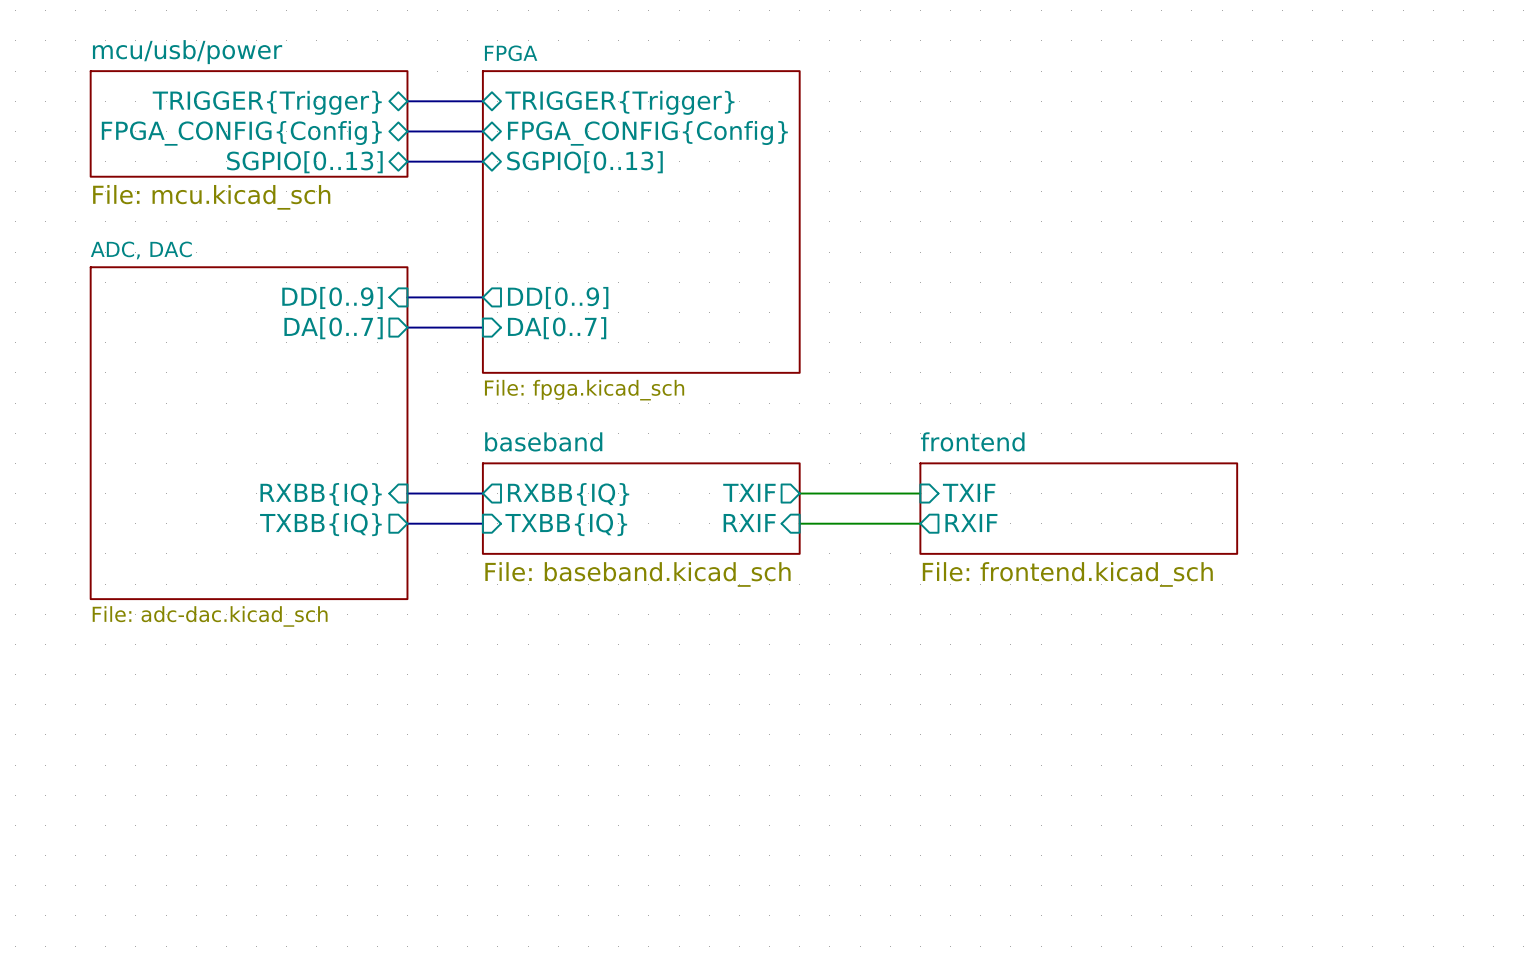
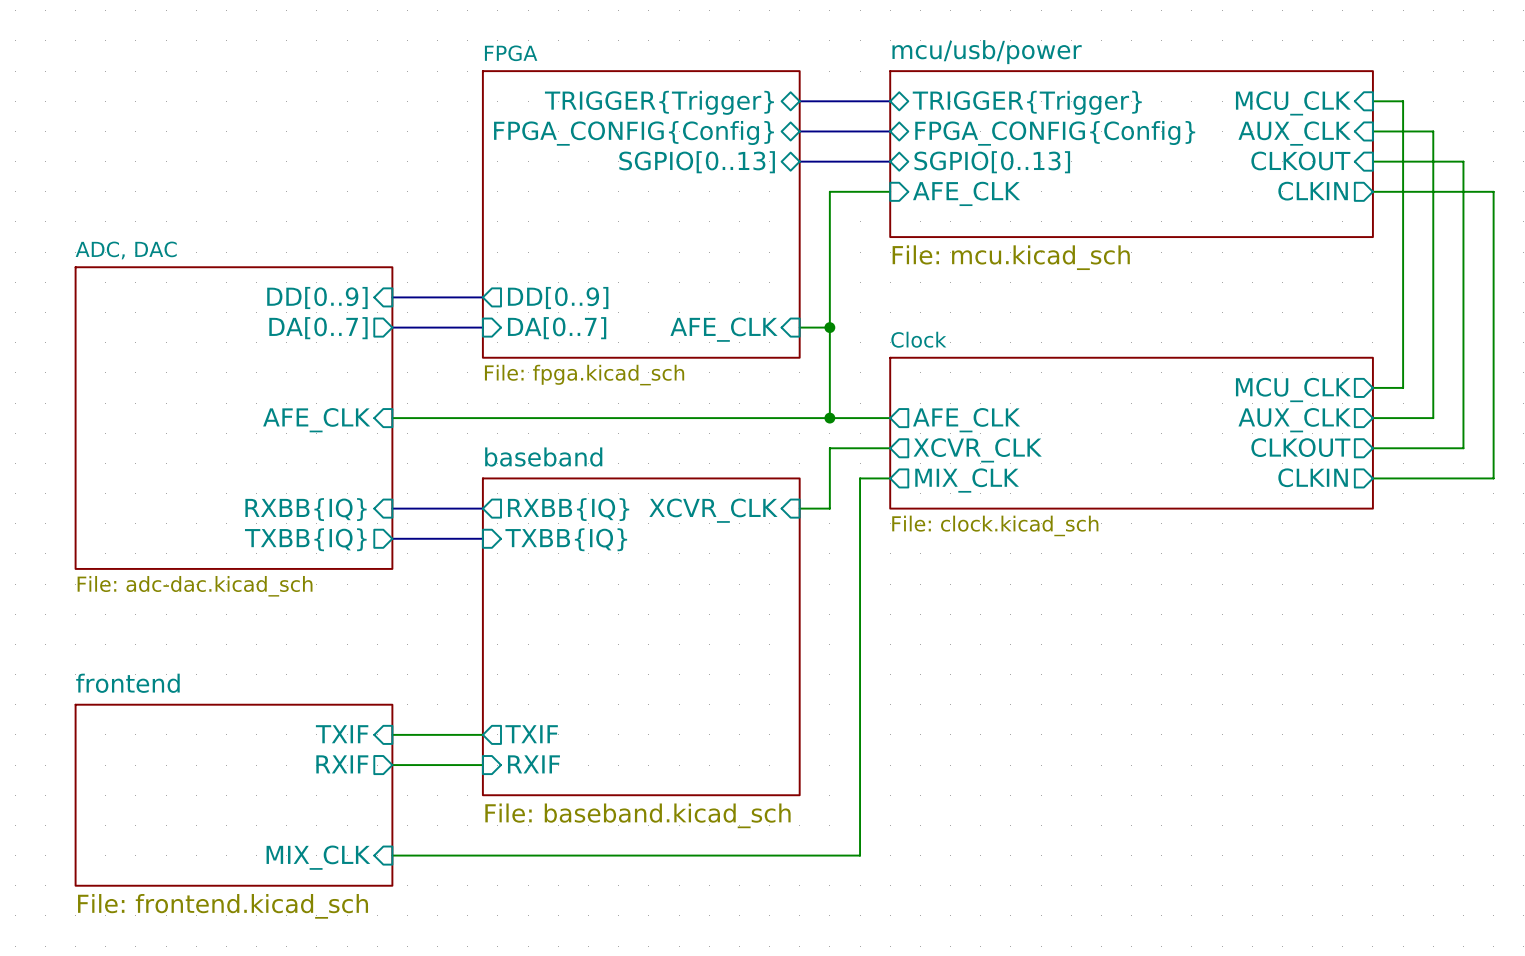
sheet FPGA shape: [481, 70, 801, 374] -> [481, 70, 801, 359]
bus: (407, 101) (482, 101) -> none
bus: none -> (799, 101) (890, 101)
wire: none -> (1372, 101) (1403, 101) (1403, 387) (1372, 387)
sheet pin: TRIGGER{Trigger} (267, 102) -> none
sheet pin rotation: 0° (619, 102) -> 180° (659, 102)
sheet pin: none -> TRIGGER{Trigger} (1027, 102)
sheet pin: none -> MCU_CLK (1293, 103)
sheet mcu/usb/power: File: mcu.kicad_sch (249, 123) -> none
bus: (407, 131) (482, 131) -> none
bus: none -> (799, 131) (890, 131)
wire: none -> (1372, 131) (1433, 131) (1433, 418) (1372, 418)
sheet pin: FPGA_CONFIG{Config} (241, 133) -> none
sheet pin rotation: 0° (647, 133) -> 180° (634, 133)
sheet pin: none -> FPGA_CONFIG{Config} (1055, 133)
sheet pin: none -> AUX_CLK (1294, 133)
sheet mcu/usb/power: none -> File: mcu.kicad_sch (1131, 154)
sheet pin: none -> CLKOUT (1300, 160)
bus: (407, 161) (482, 161) -> none
bus: none -> (799, 161) (890, 161)
wire: none -> (1372, 161) (1463, 161) (1463, 448) (1372, 448)
sheet pin: SGPIO[0..13] (304, 162) -> none
sheet pin rotation: 0° (584, 162) -> 180° (697, 162)
sheet pin: none -> SGPIO[0..13] (992, 162)
wire: none -> (890, 191) (829, 191) (829, 418)
sheet pin: none -> CLKIN (1313, 191)
wire: none -> (1372, 191) (1493, 191) (1493, 478) (1372, 478)
sheet pin: none -> AFE_CLK (966, 193)
sheet pin position: DD[0..9] (332, 297) -> DD[0..9] (317, 297)
bus: none -> (392, 297) (407, 297)
bus: none -> (392, 327) (407, 327)
wire: none -> (799, 327) (829, 327)
junction: none -> (829, 327)
sheet pin position: DA[0..7] (333, 328) -> DA[0..7] (318, 328)
sheet pin: none -> AFE_CLK (724, 329)
sheet pin: none -> MCU_CLK (1293, 390)
sheet ADC, DAC: none -> File: adc-dac.kicad_sch (233, 418)
wire: none -> (392, 418) (890, 418)
junction: none -> (829, 418)
sheet pin: none -> AFE_CLK (316, 420)
sheet pin: none -> AFE_CLK (966, 420)
sheet pin: none -> AUX_CLK (1294, 420)
sheet ADC, DAC: File: adc-dac.kicad_sch (249, 433) -> none
sheet Clock: none -> File: clock.kicad_sch (1131, 433)
sheet pin: none -> CLKOUT (1300, 447)
wire: none -> (890, 448) (829, 448) (829, 508) (799, 508)
sheet pin: none -> XCVR_CLK (977, 450)
sheet pin: none -> CLKIN (1313, 477)
wire: none -> (890, 478) (860, 478) (860, 855) (392, 855)
sheet pin: none -> MIX_CLK (967, 480)
sheet pin: TXIF (749, 492) -> none
sheet pin: TXIF (969, 492) -> none
bus: (407, 493) (482, 493) -> none
wire: (799, 493) (920, 493) -> none
sheet pin position: RXBB{IQ} (321, 494) -> RXBB{IQ} (306, 509)
sheet pin position: RXBB{IQ} (568, 494) -> RXBB{IQ} (568, 509)
bus: none -> (392, 508) (482, 508)
sheet baseband: File: baseband.kicad_sch (641, 508) -> none
sheet frontend: File: frontend.kicad_sch (1078, 508) -> none
sheet pin: none -> XCVR_CLK (713, 510)
bus: (407, 523) (482, 523) -> none
sheet pin: RXIF (749, 523) -> none
wire: (799, 523) (920, 523) -> none
sheet pin: RXIF (971, 523) -> none
sheet pin position: TXBB{IQ} (320, 524) -> TXBB{IQ} (305, 539)
sheet pin position: TXBB{IQ} (566, 524) -> TXBB{IQ} (566, 539)
bus: none -> (392, 538) (482, 538)
sheet baseband: none -> File: baseband.kicad_sch (641, 636)
sheet pin: none -> TXIF (342, 734)
wire: none -> (392, 734) (482, 734)
sheet pin: none -> TXIF (531, 734)
sheet pin: none -> RXIF (342, 764)
sheet pin: none -> RXIF (533, 764)
wire: none -> (392, 765) (482, 765)
sheet frontend: none -> File: frontend.kicad_sch (233, 795)
sheet pin: none -> MIX_CLK (318, 857)

